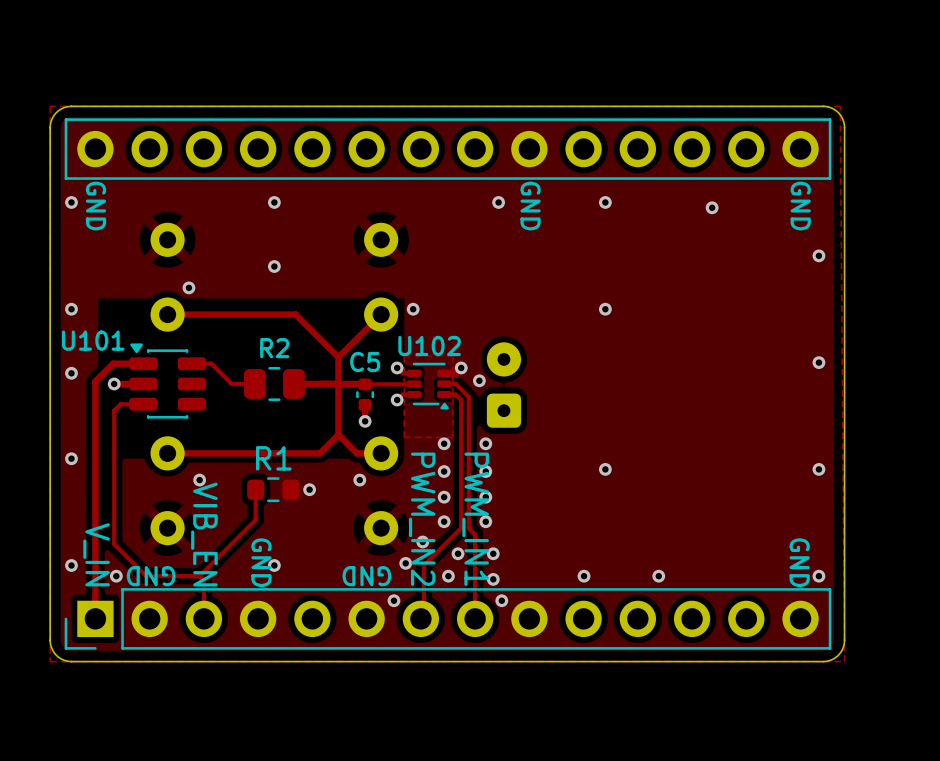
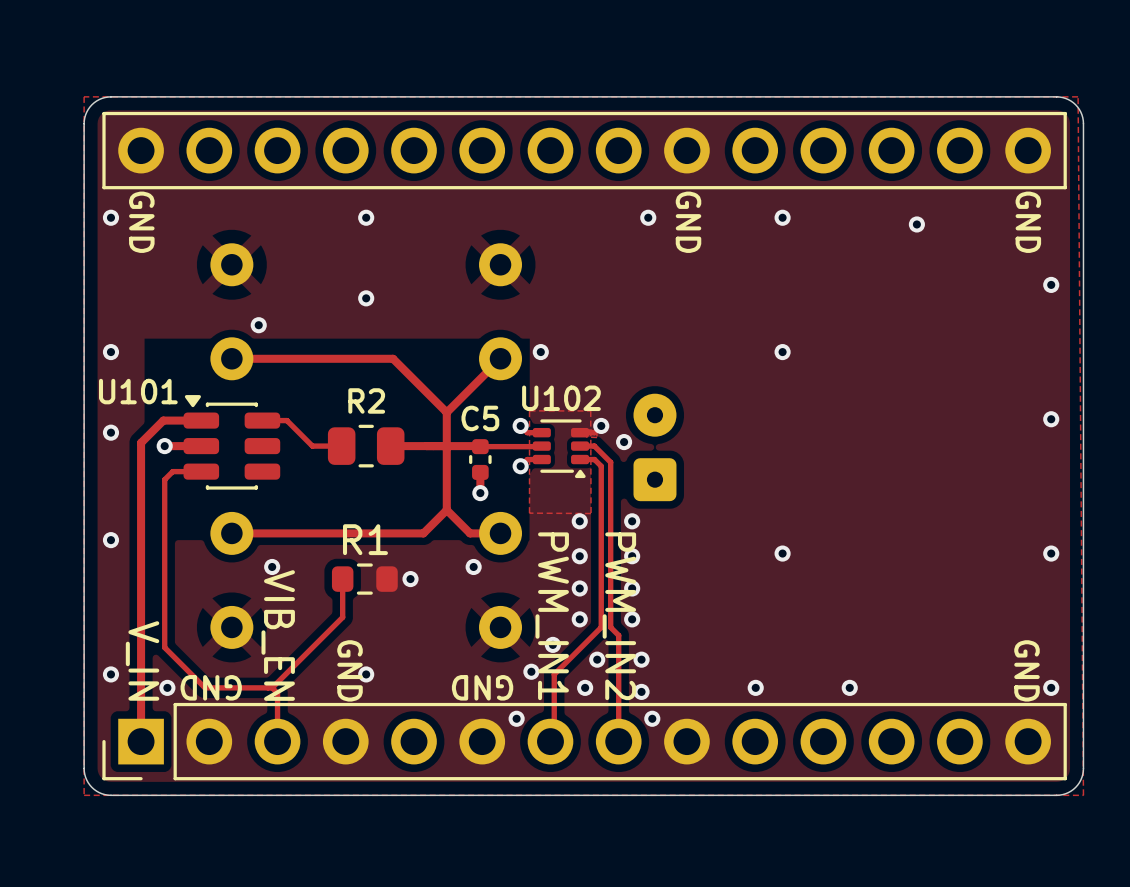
text: PWM_IN2 (422, 519) -> PWM_IN1 (552, 616)
text: PWM_IN1 (475, 519) -> PWM_IN2 (619, 616)

